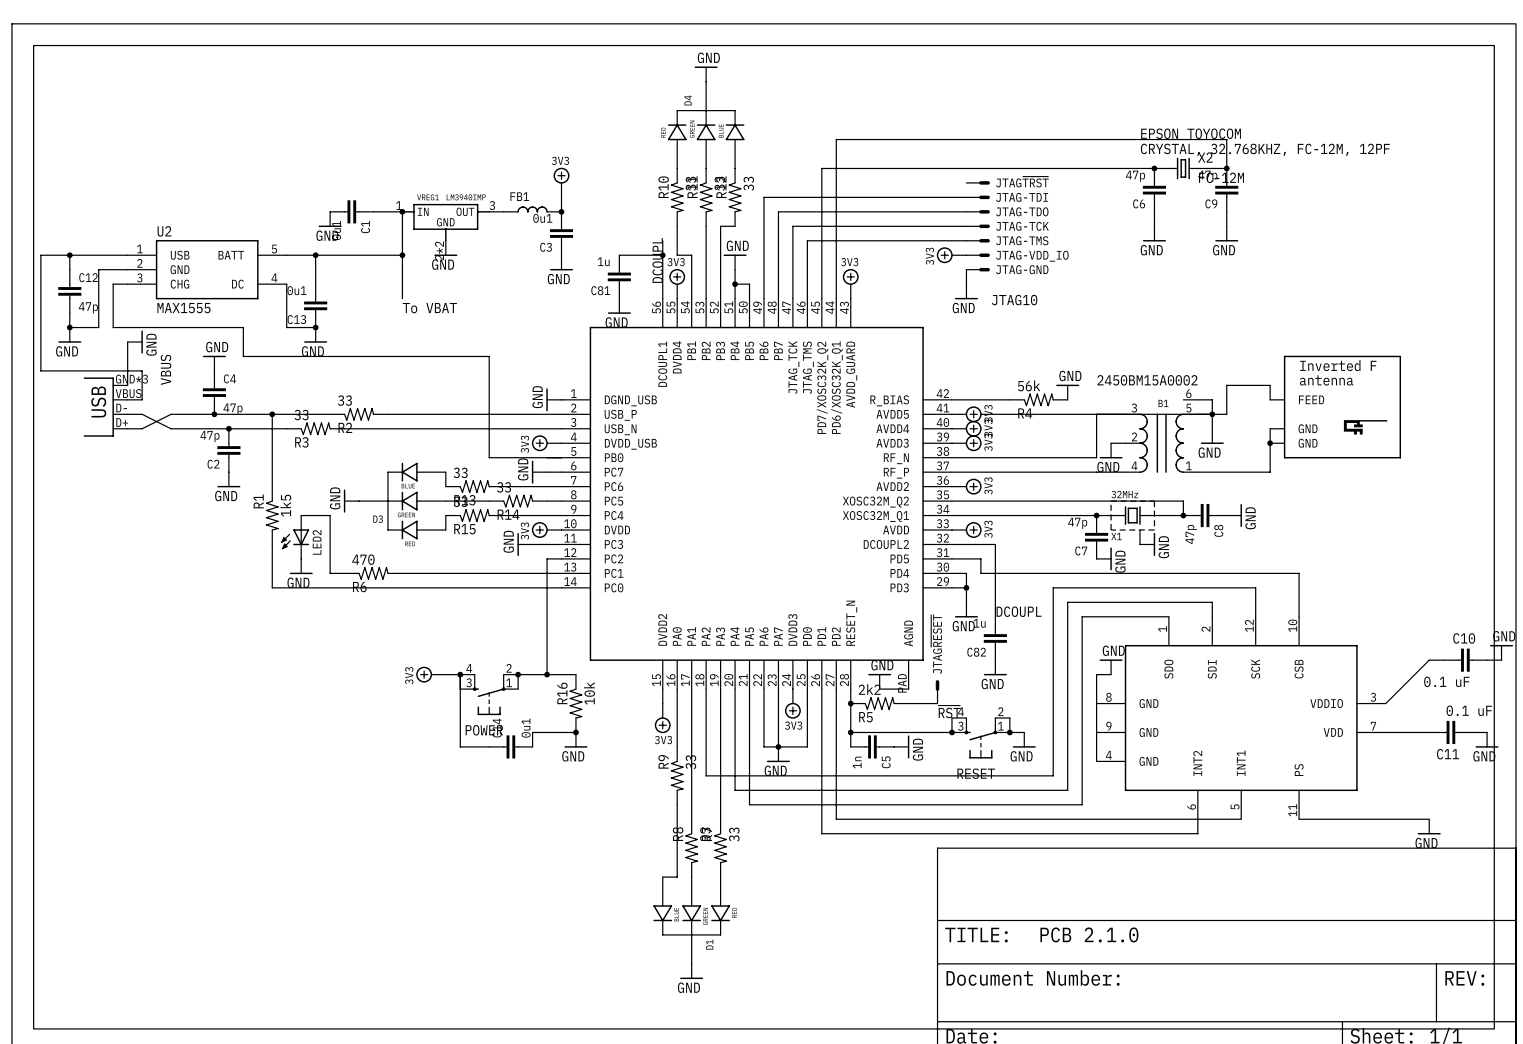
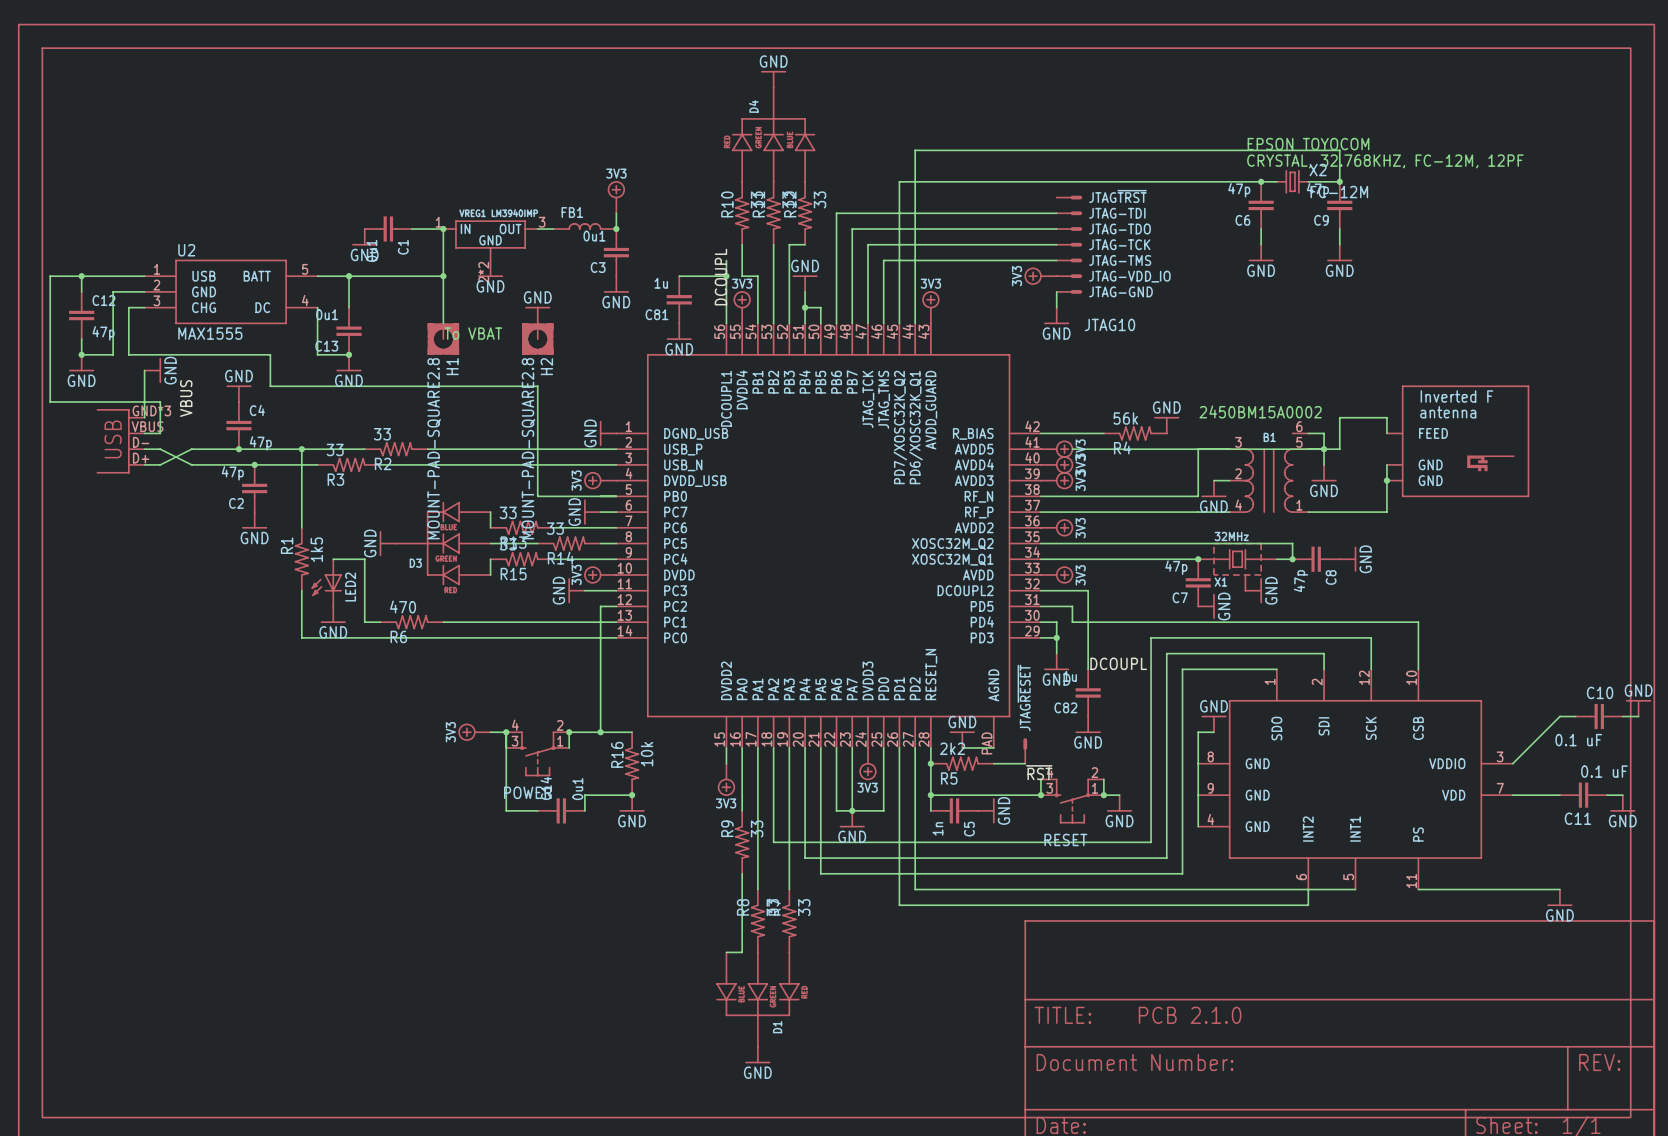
power symbol: none -> GND (537, 315)
H1: none -> MOUNT-PAD-SQUARE2.8 (443, 339)
H2: none -> MOUNT-PAD-SQUARE2.8 (537, 339)

